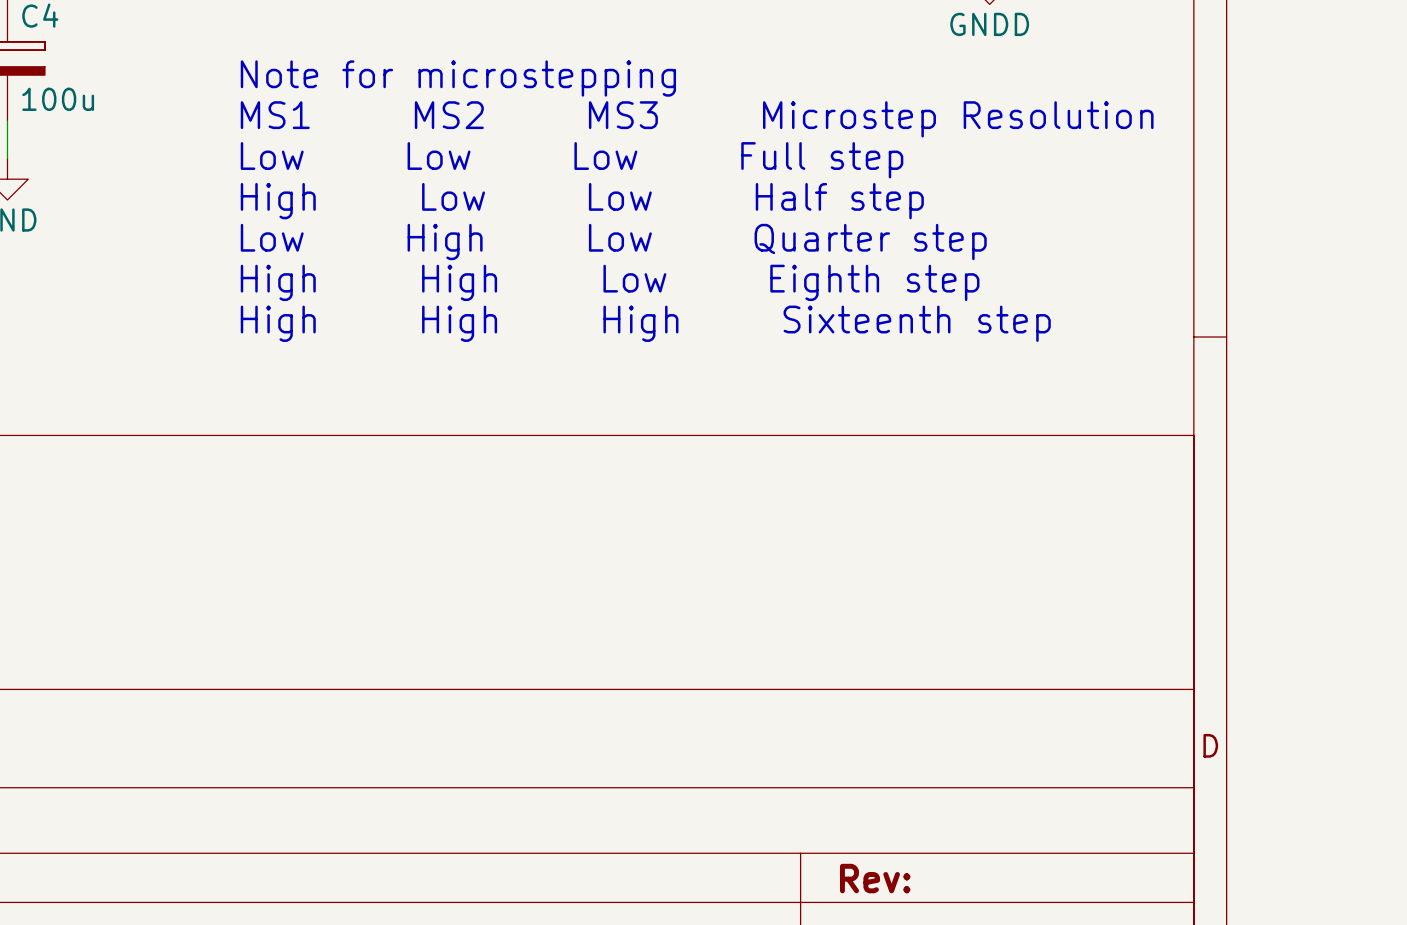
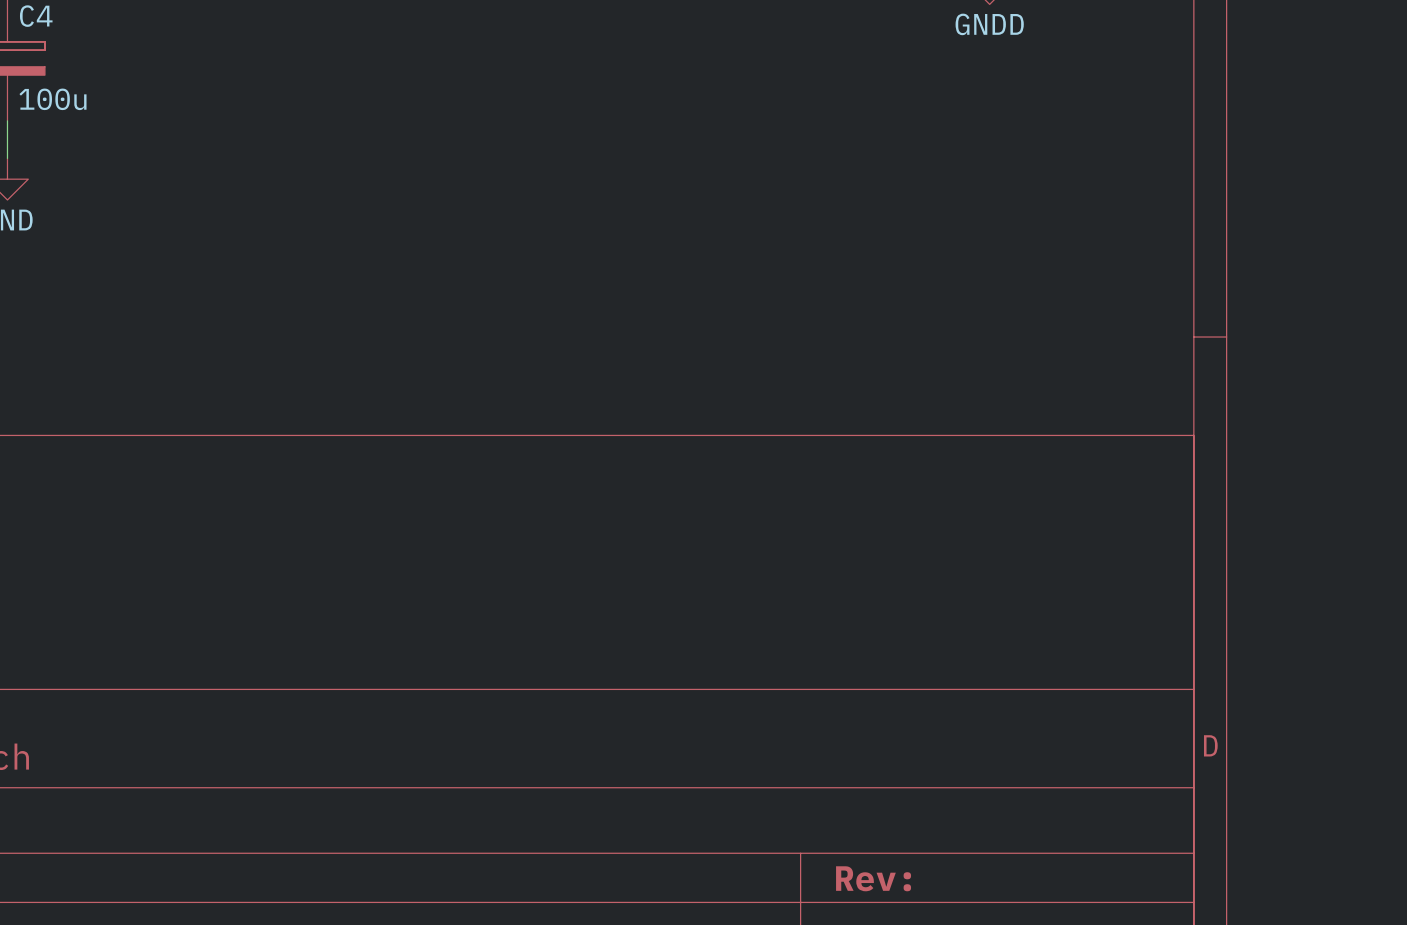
text: Note for microstepping (458, 78) -> none
text: MS1 MS2 MS3 Microstep Resolution (697, 119) -> none
text: Low Low Low Full step (572, 160) -> none
text: High Low Low Half step (582, 201) -> none
text: Low High Low Quarter step (613, 242) -> none
text: High High Low Eighth step (610, 282) -> none
text: High High High Sixteenth step (645, 323) -> none

